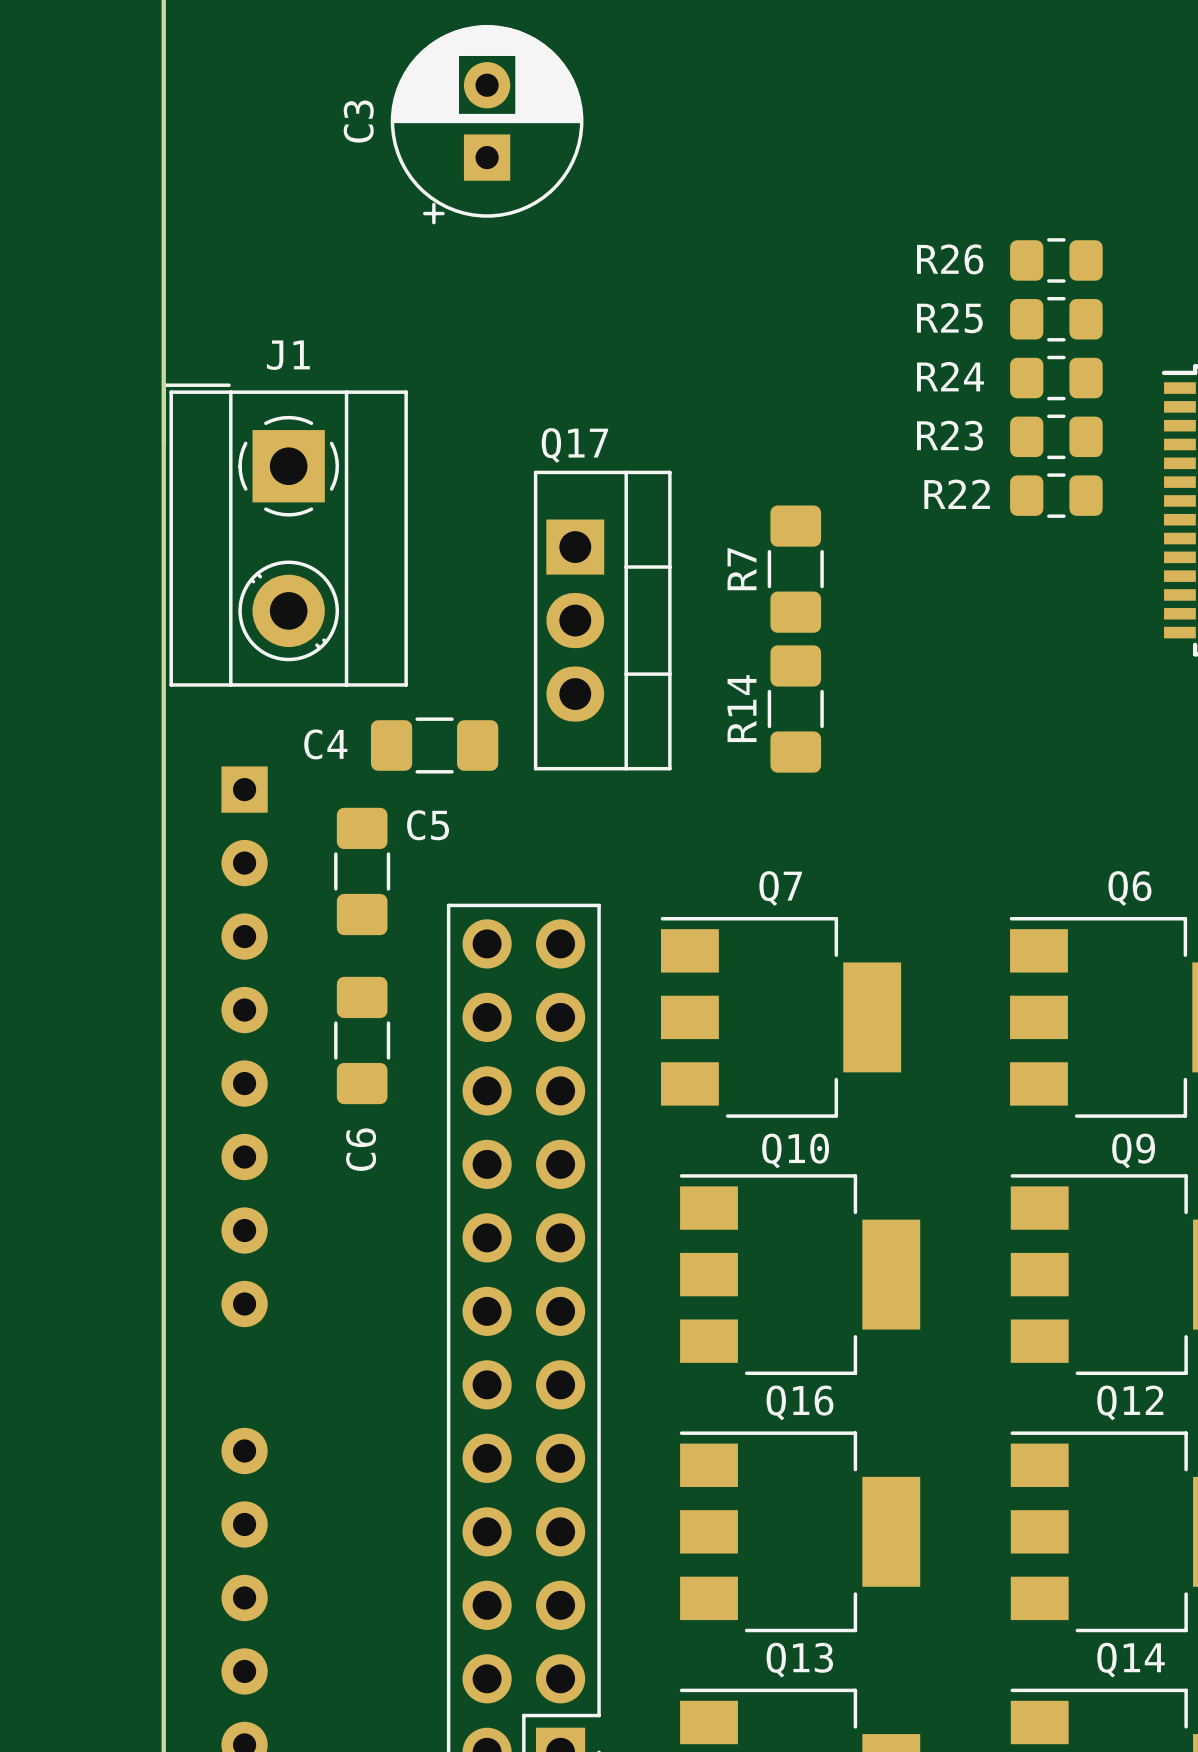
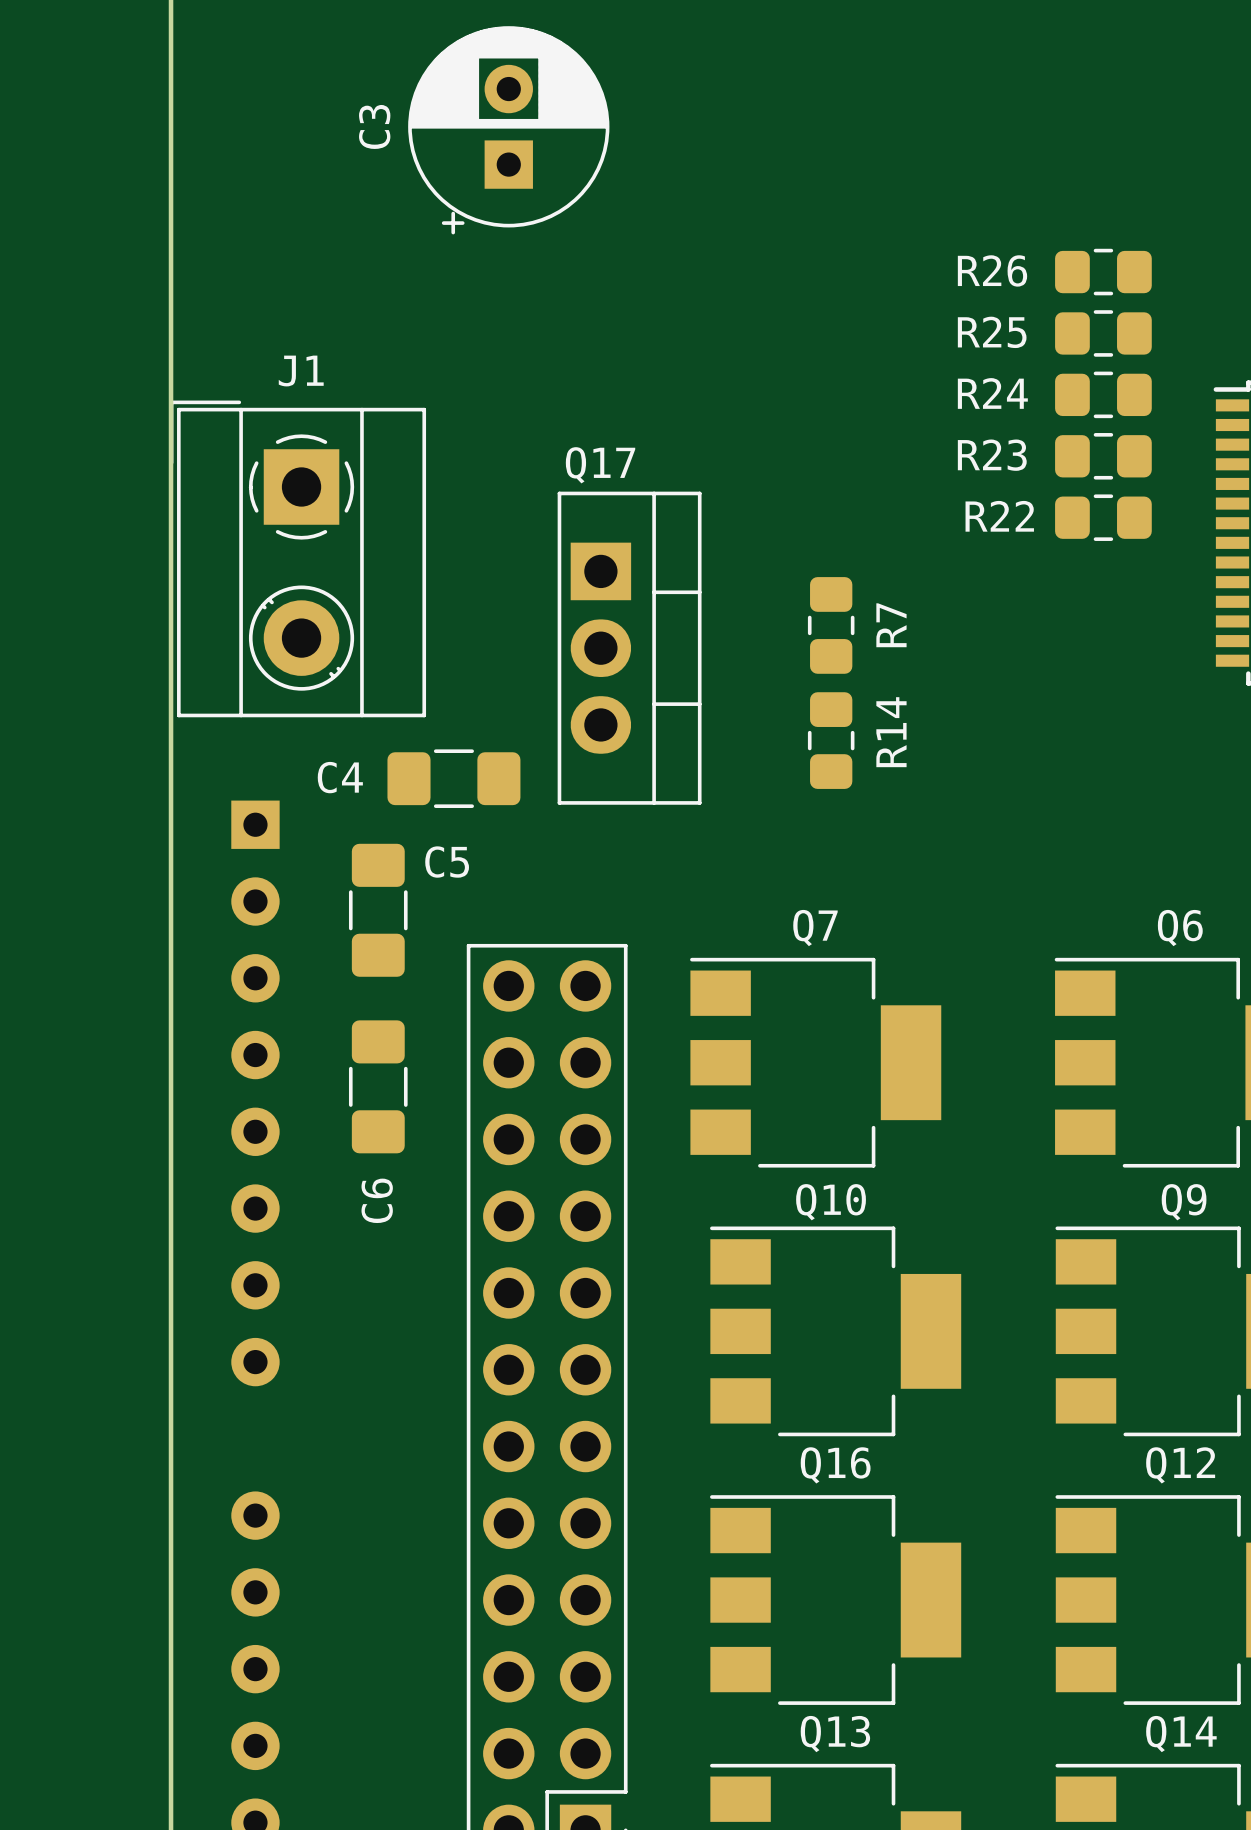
R7 footprint: [767, 505, 824, 633] -> [807, 577, 855, 674]
R7 name position: R7 (742, 569) -> R7 (891, 625)
R14 footprint: [767, 645, 824, 773] -> [807, 692, 855, 789]
R14 name position: R14 (742, 708) -> R14 (891, 732)

